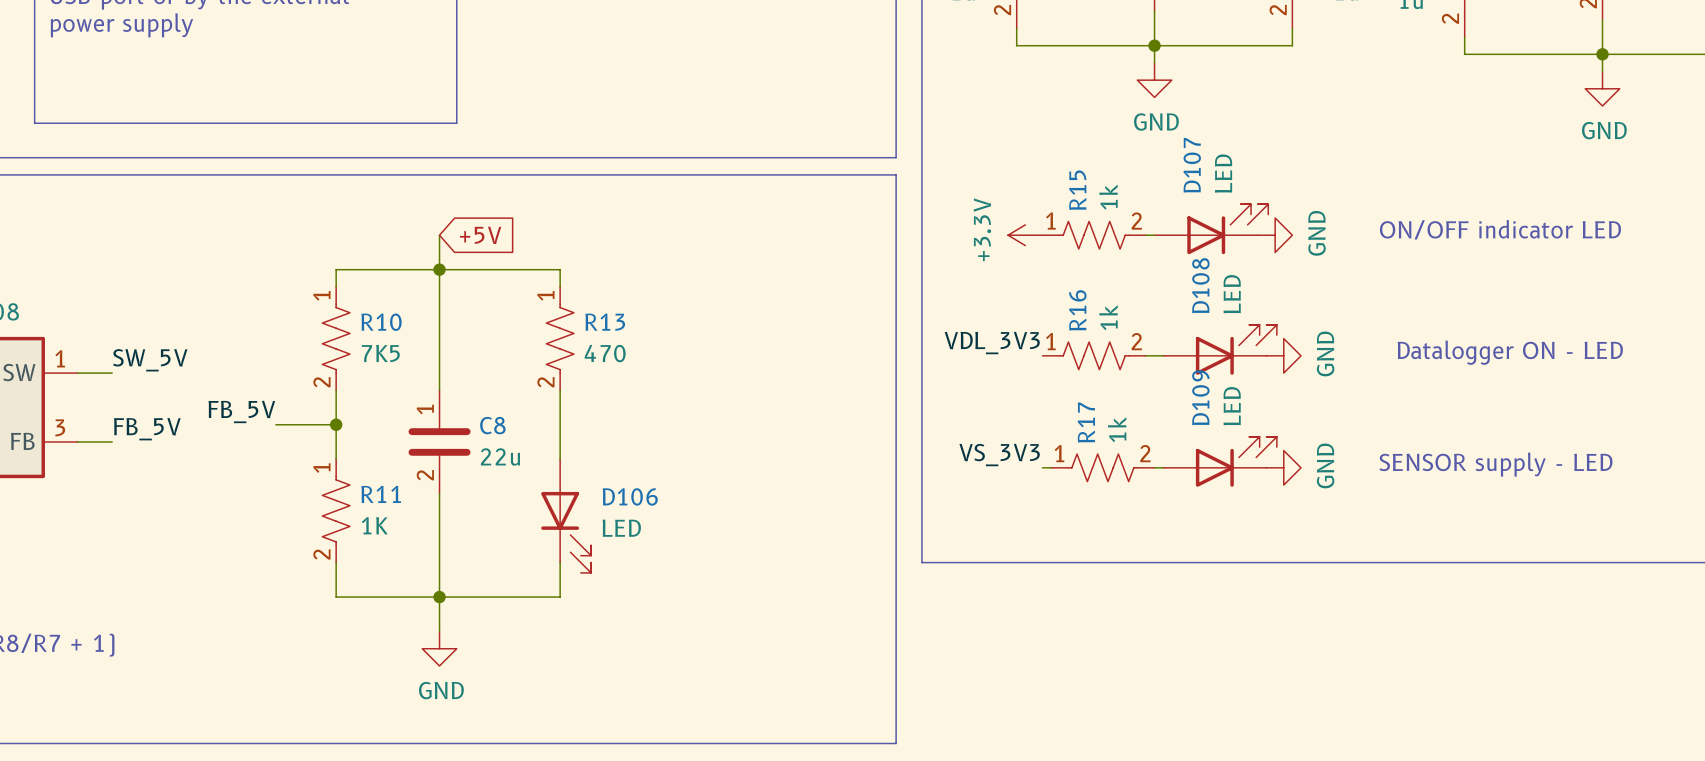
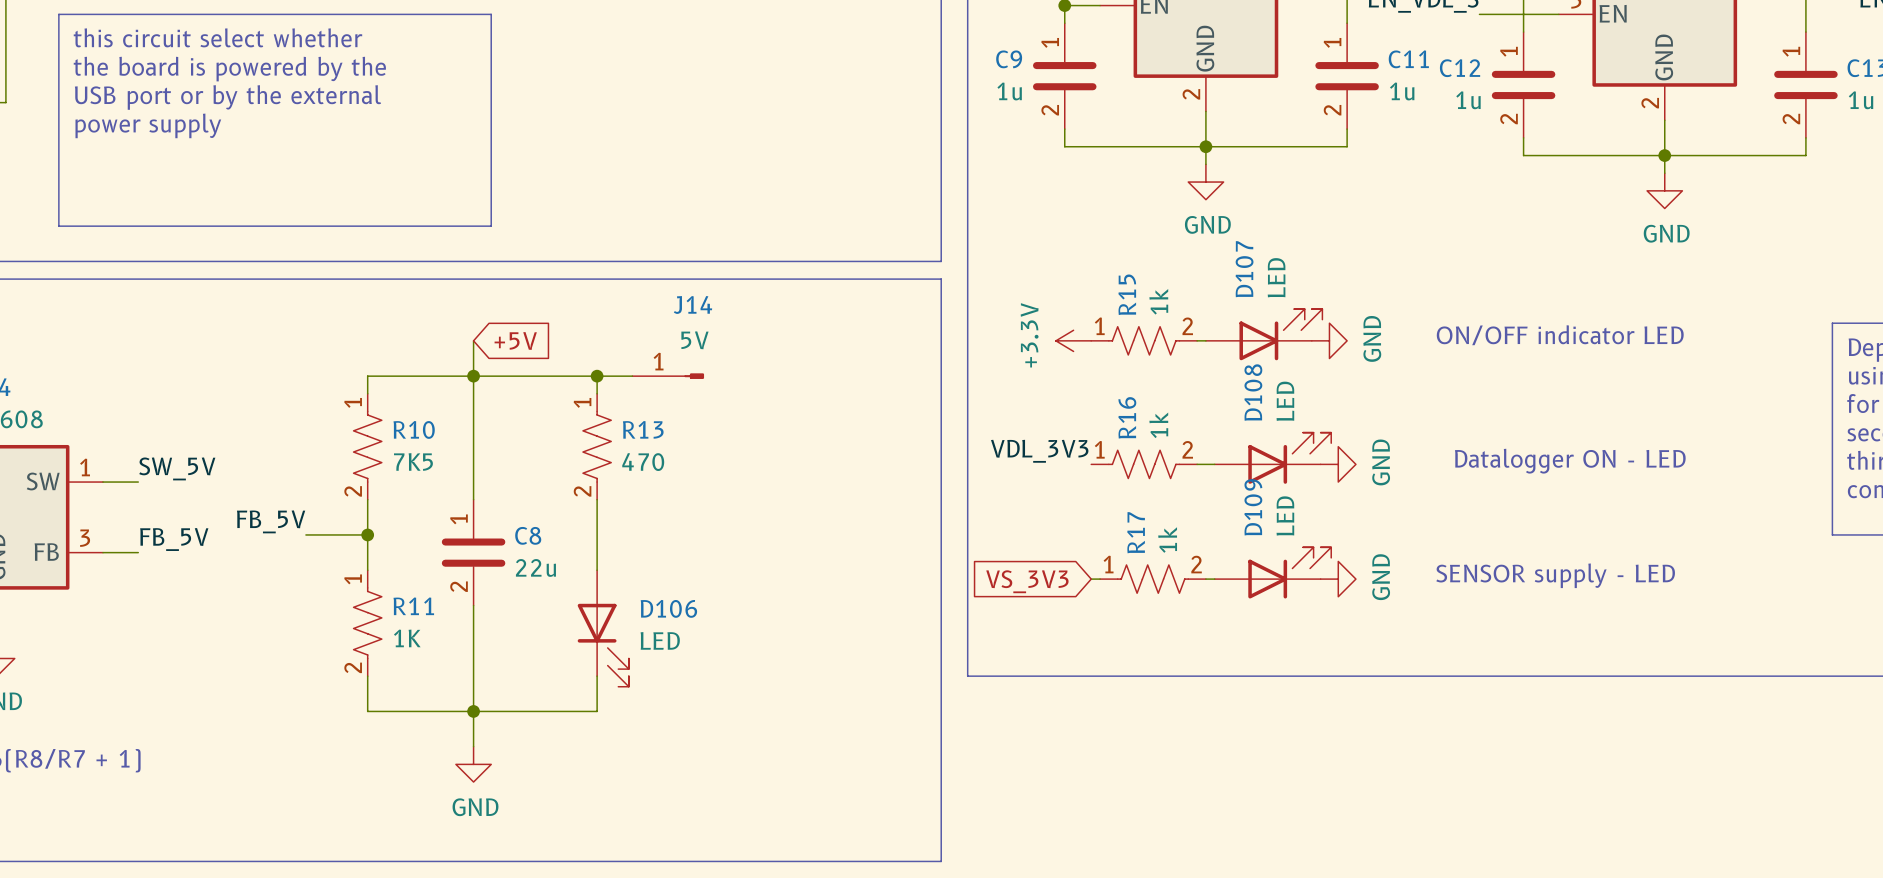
wire: none -> (597, 376) (632, 376)
junction: none -> (597, 376)
J14: none -> 5V (668, 376)
label: VS_3V3 (999, 455) -> none
global label: none -> VS_3V3 (1027, 581)

